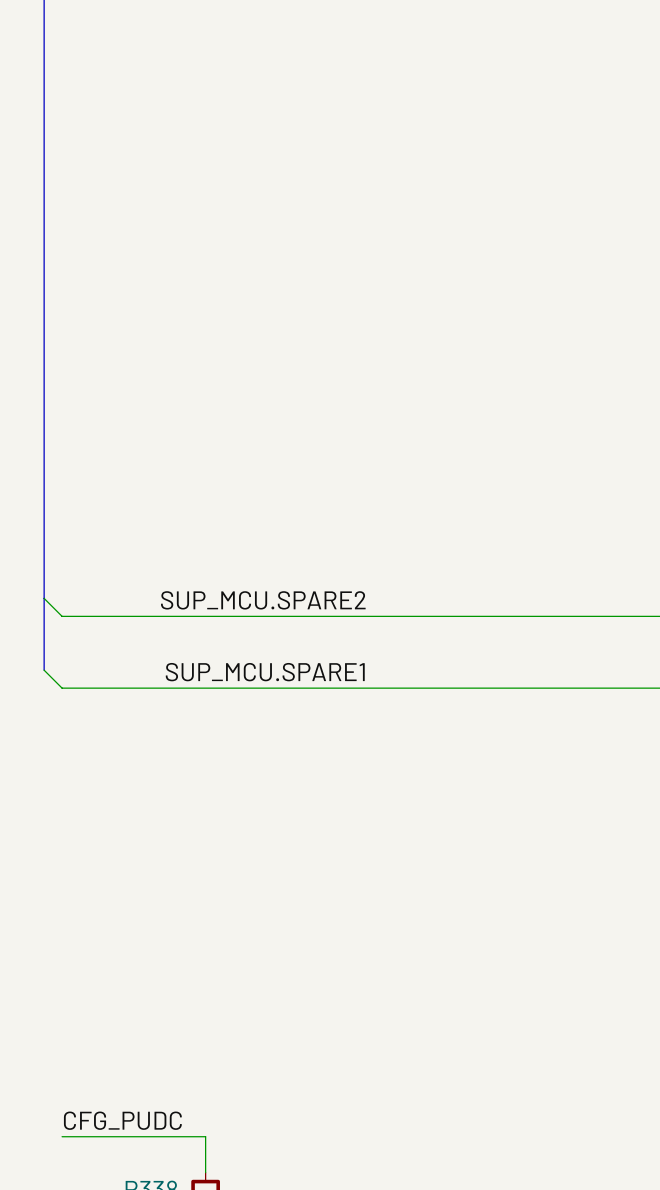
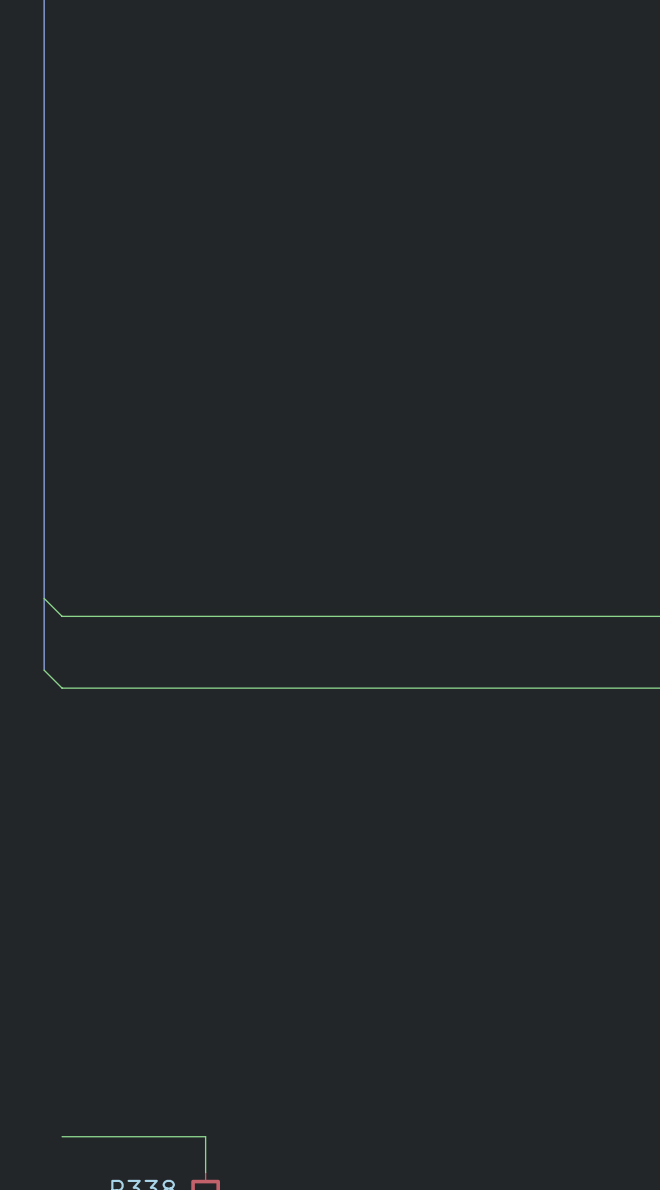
label: SUP_MCU.SPARE2 (263, 600) -> none
label: SUP_MCU.SPARE1 (265, 672) -> none
label: CFG_PUDC (122, 1120) -> none

